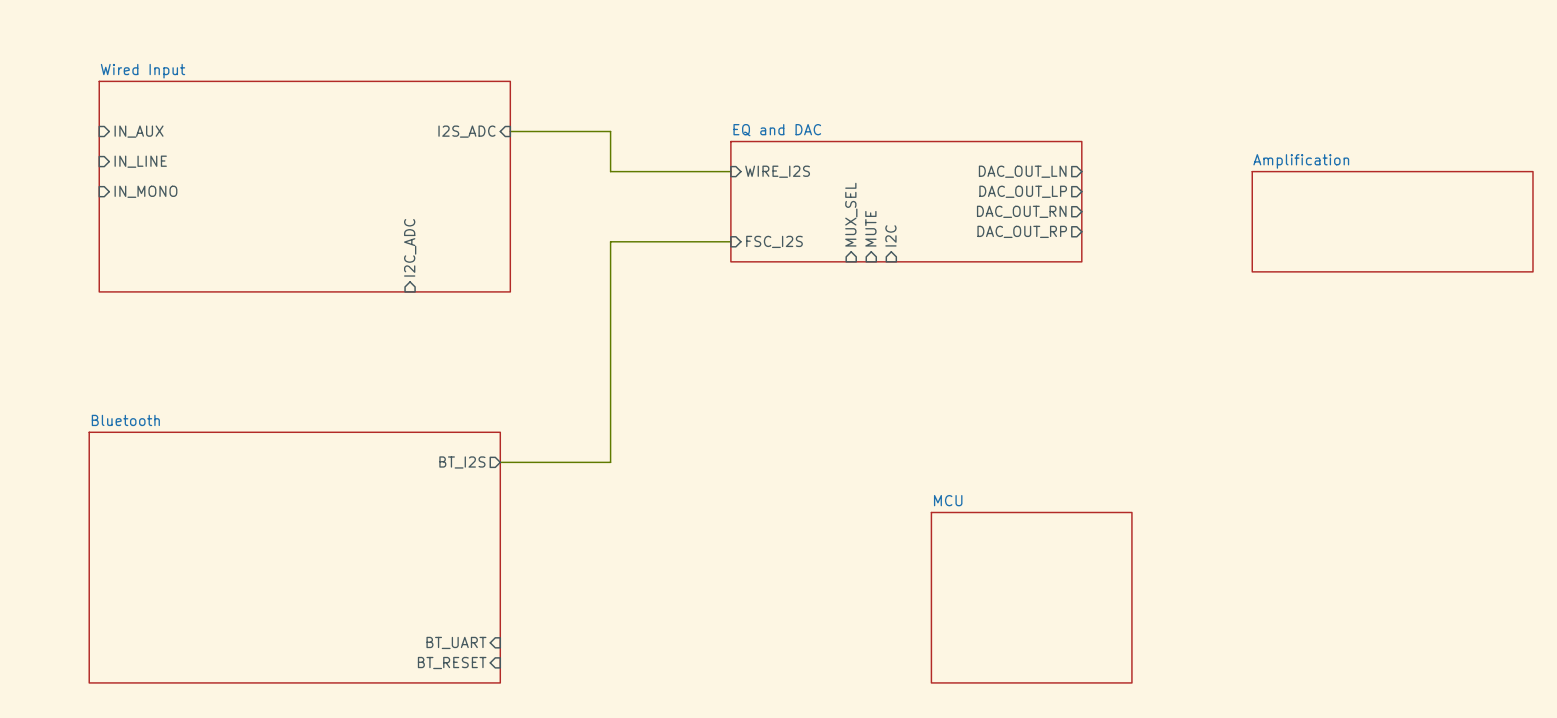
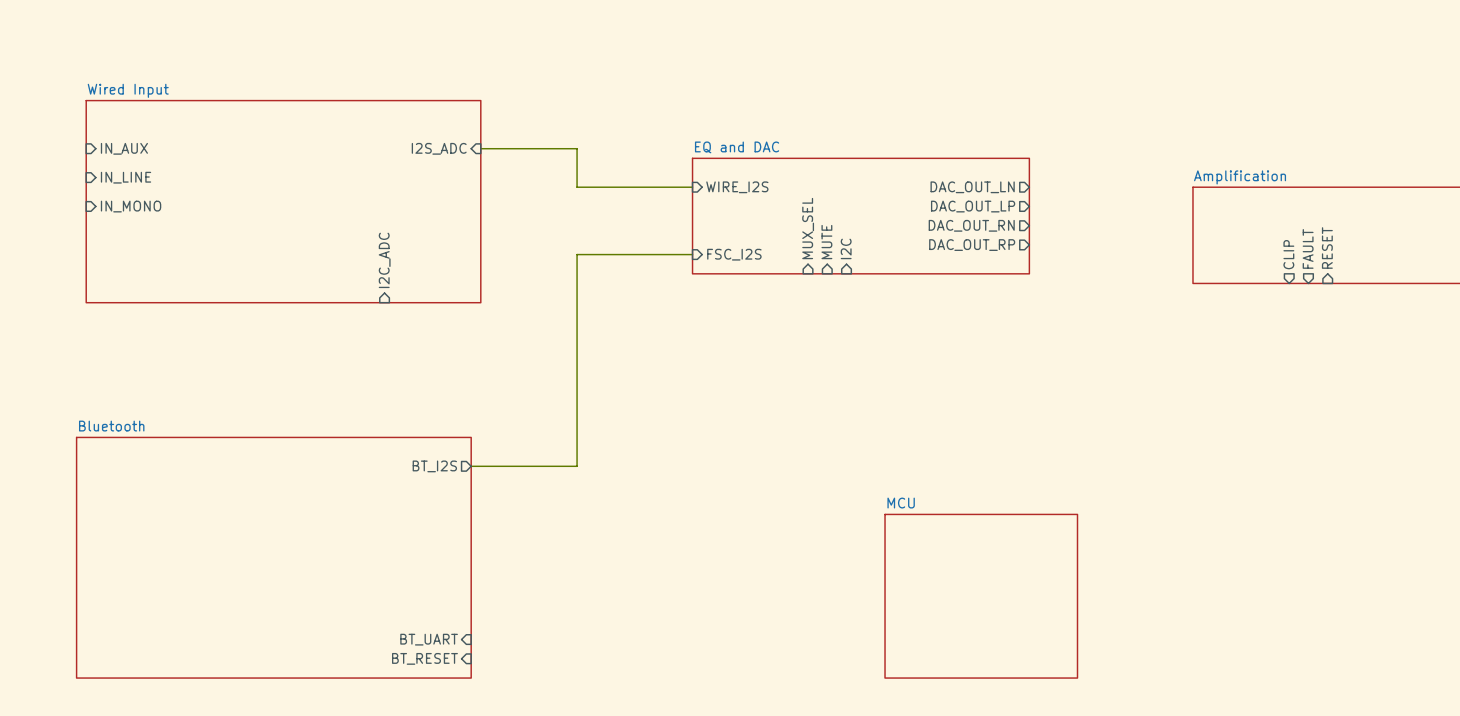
sheet pin: none -> RESET (1327, 248)
sheet pin: none -> FAULT (1308, 248)
sheet pin: none -> CLIP (1288, 254)

